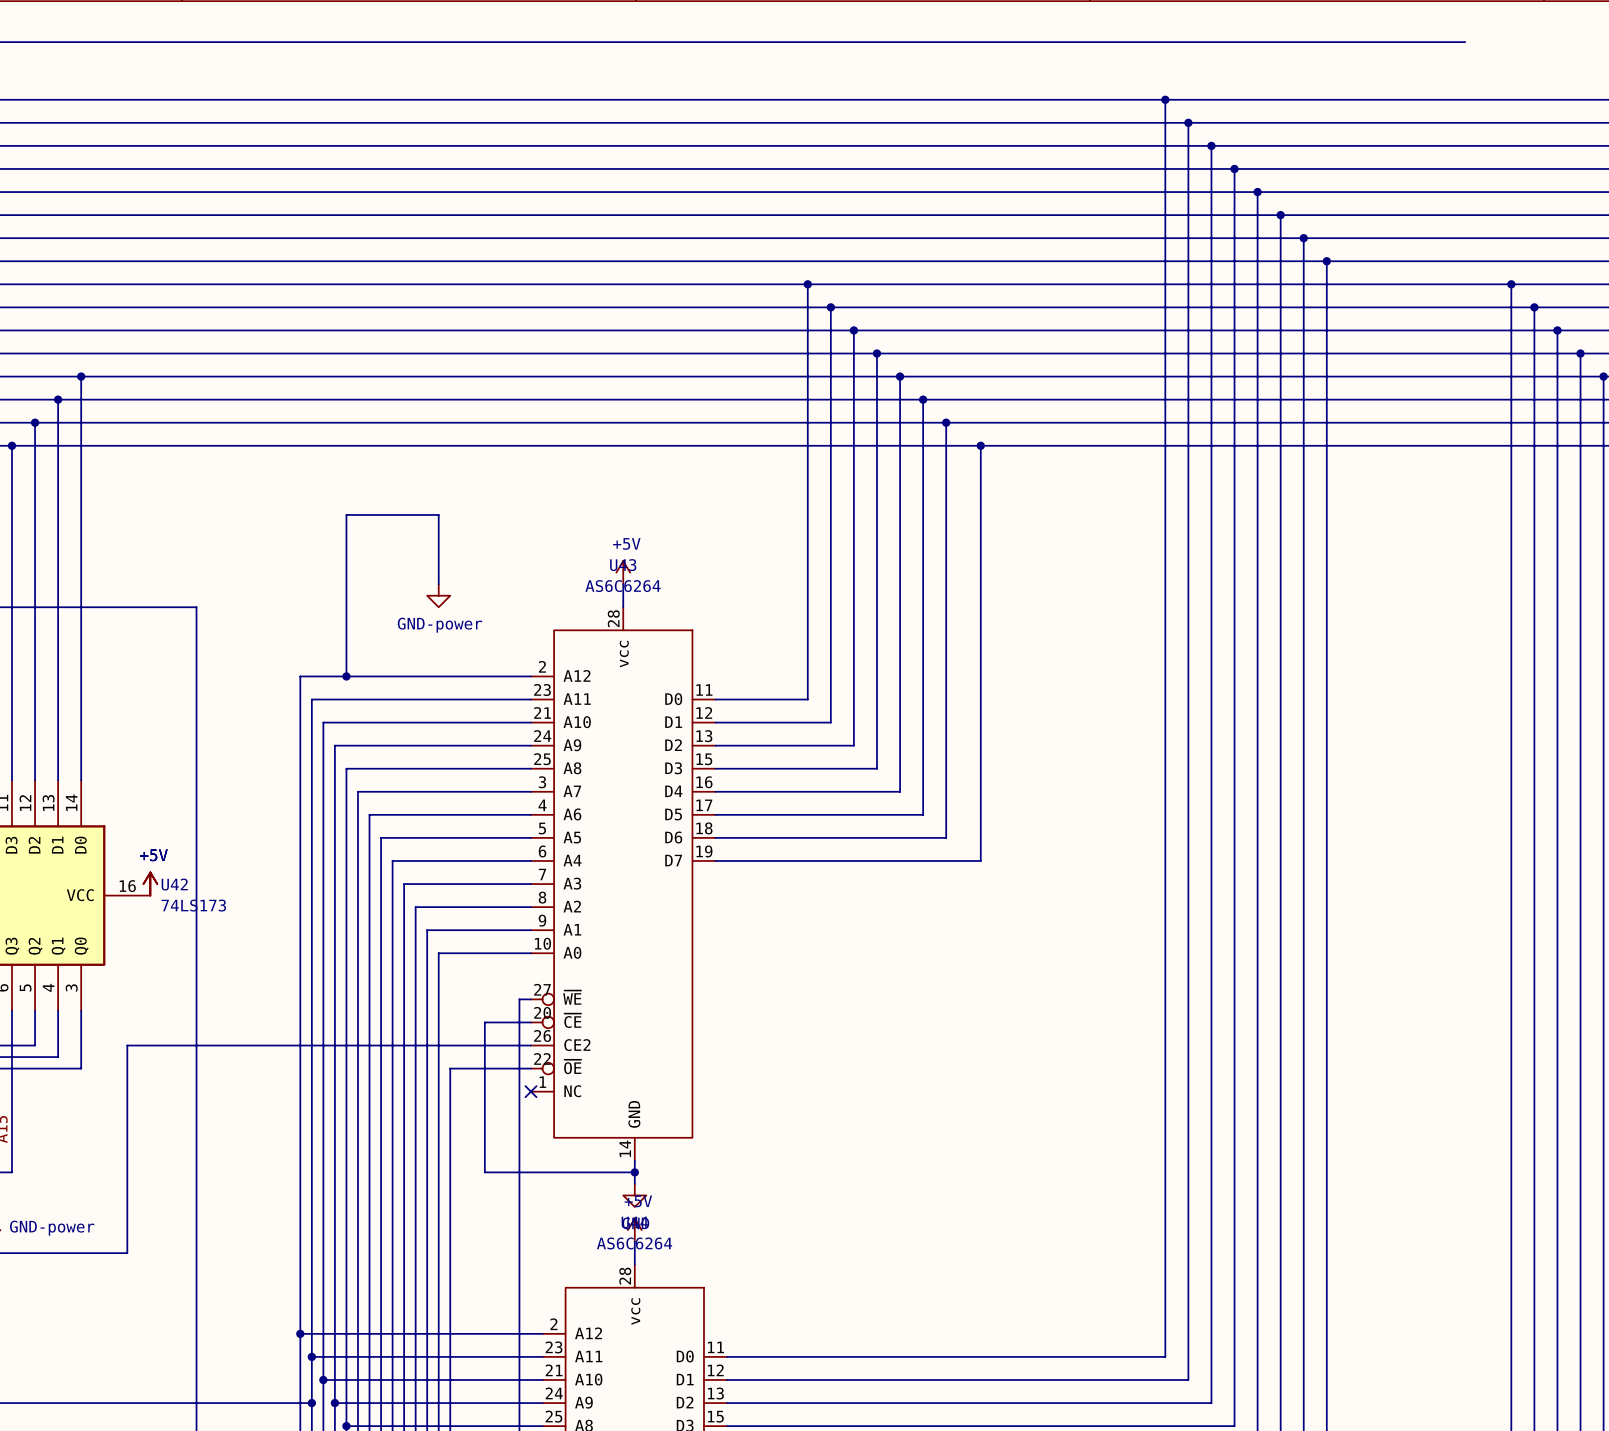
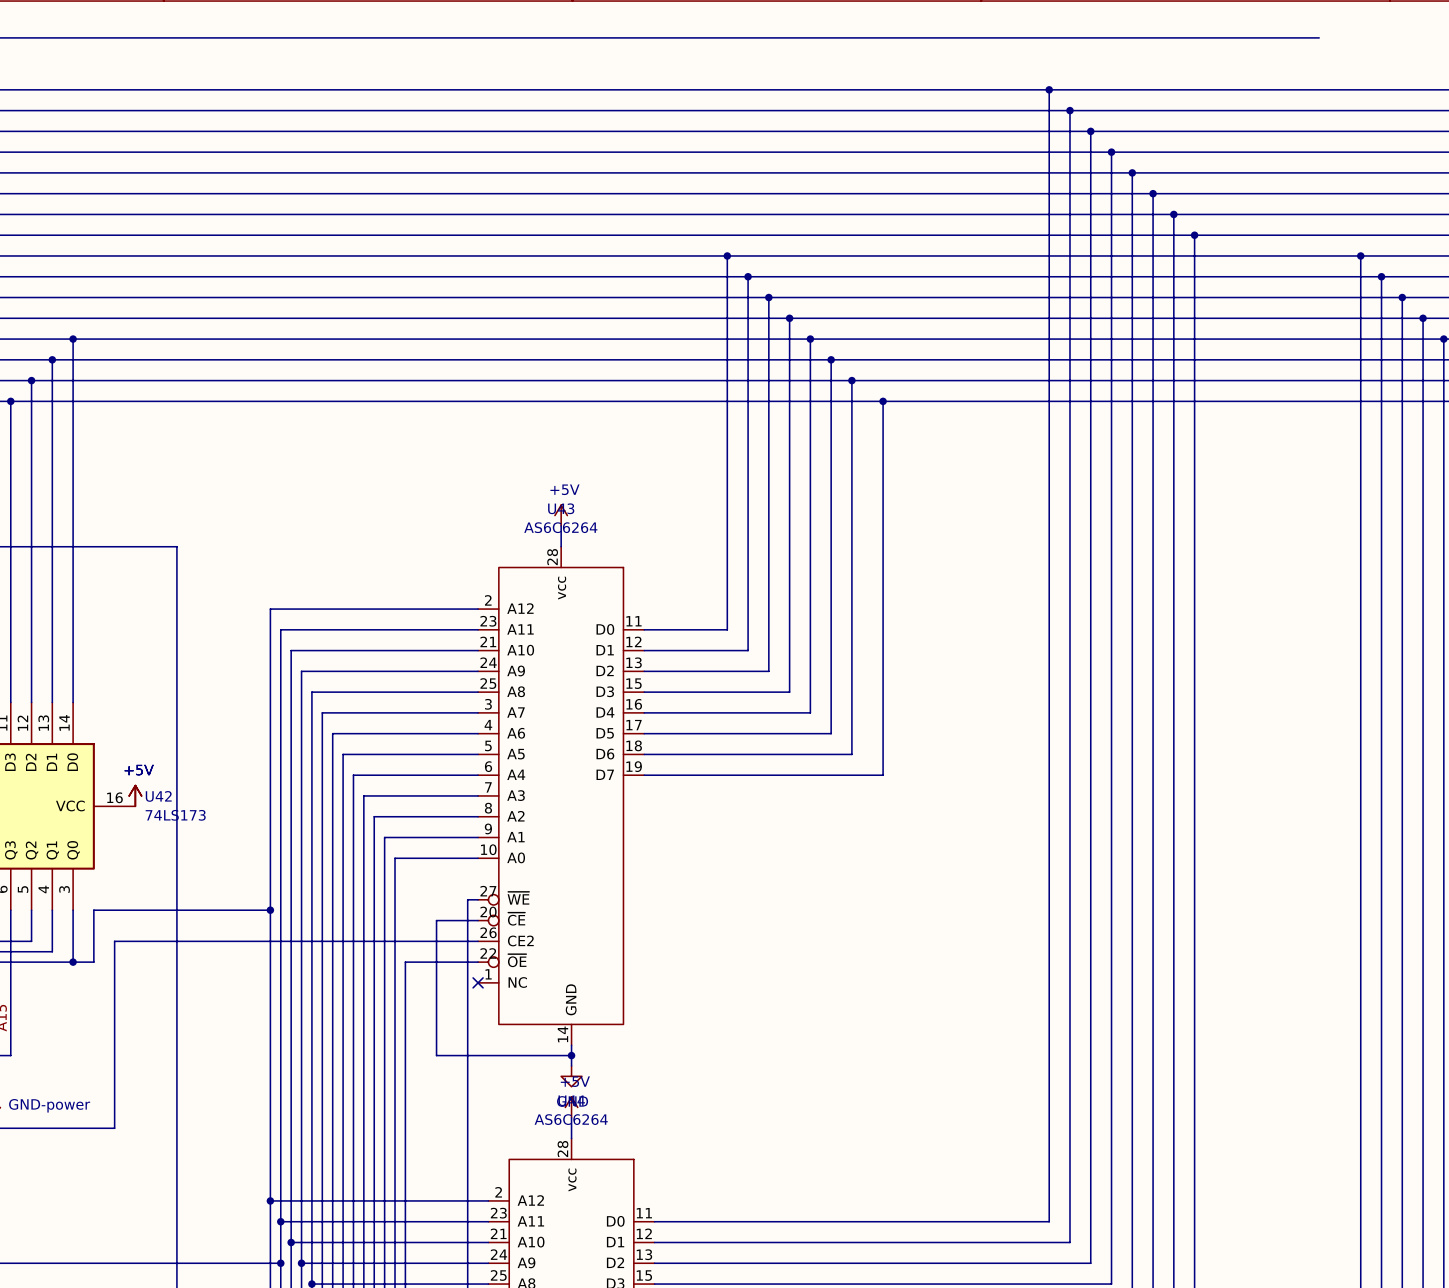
wire: (438, 584) (438, 514) (346, 514) (346, 676) -> none
power symbol: GND-power (438, 595) -> none
junction: (346, 676) -> none
wire: none -> (270, 910) (93, 910) (93, 962) (73, 962)
junction: none -> (270, 910)
junction: none -> (73, 962)

